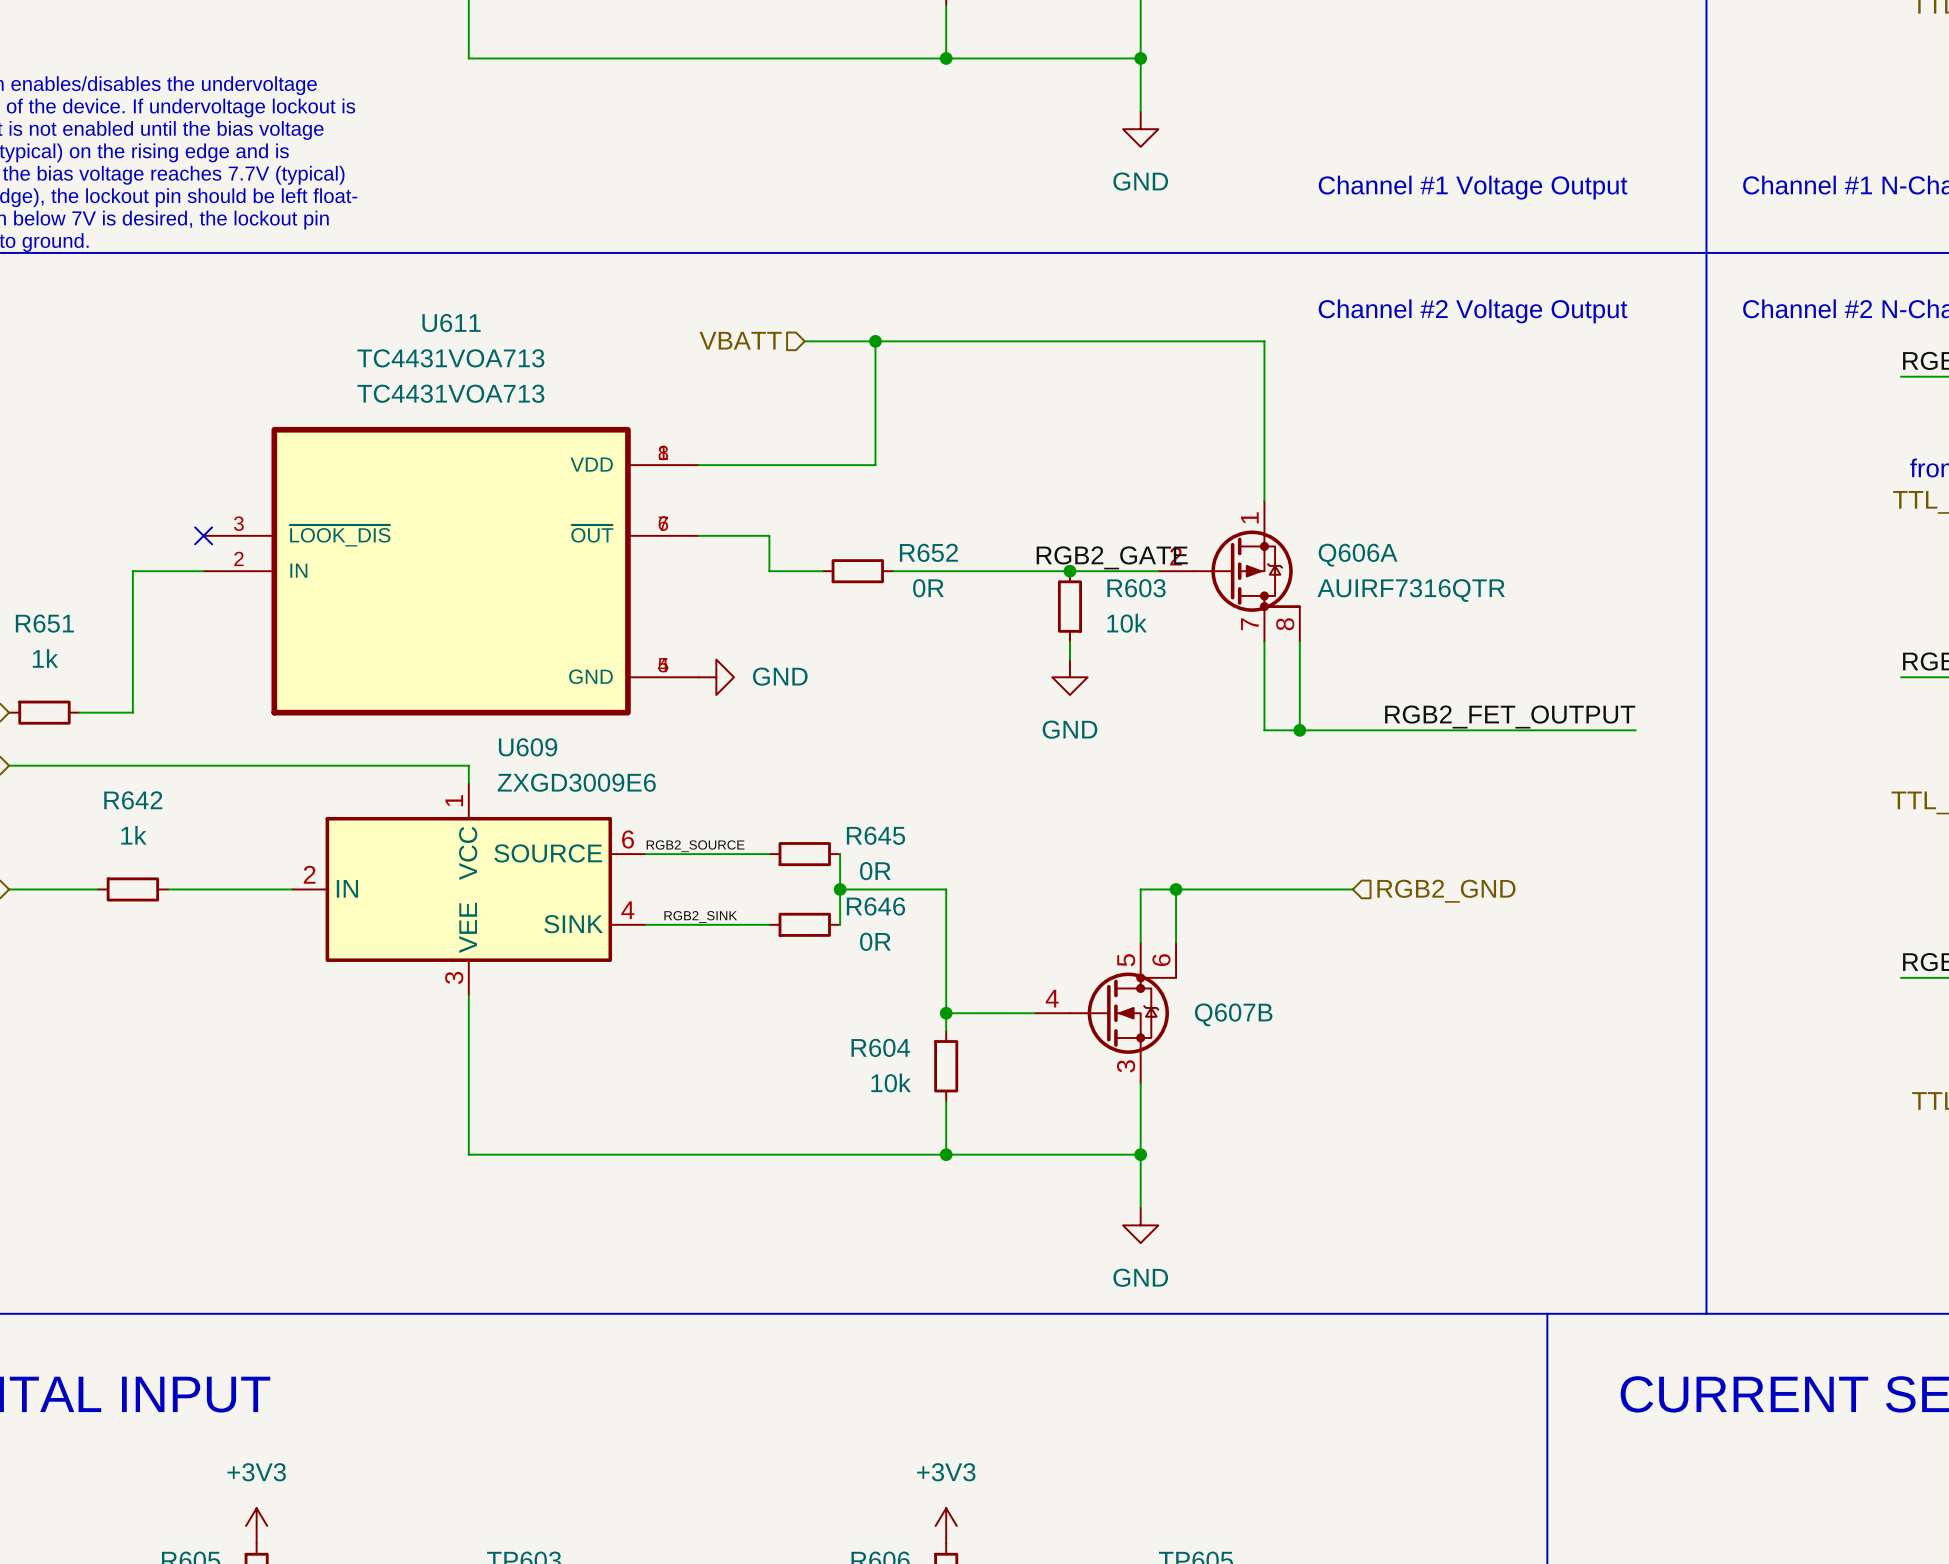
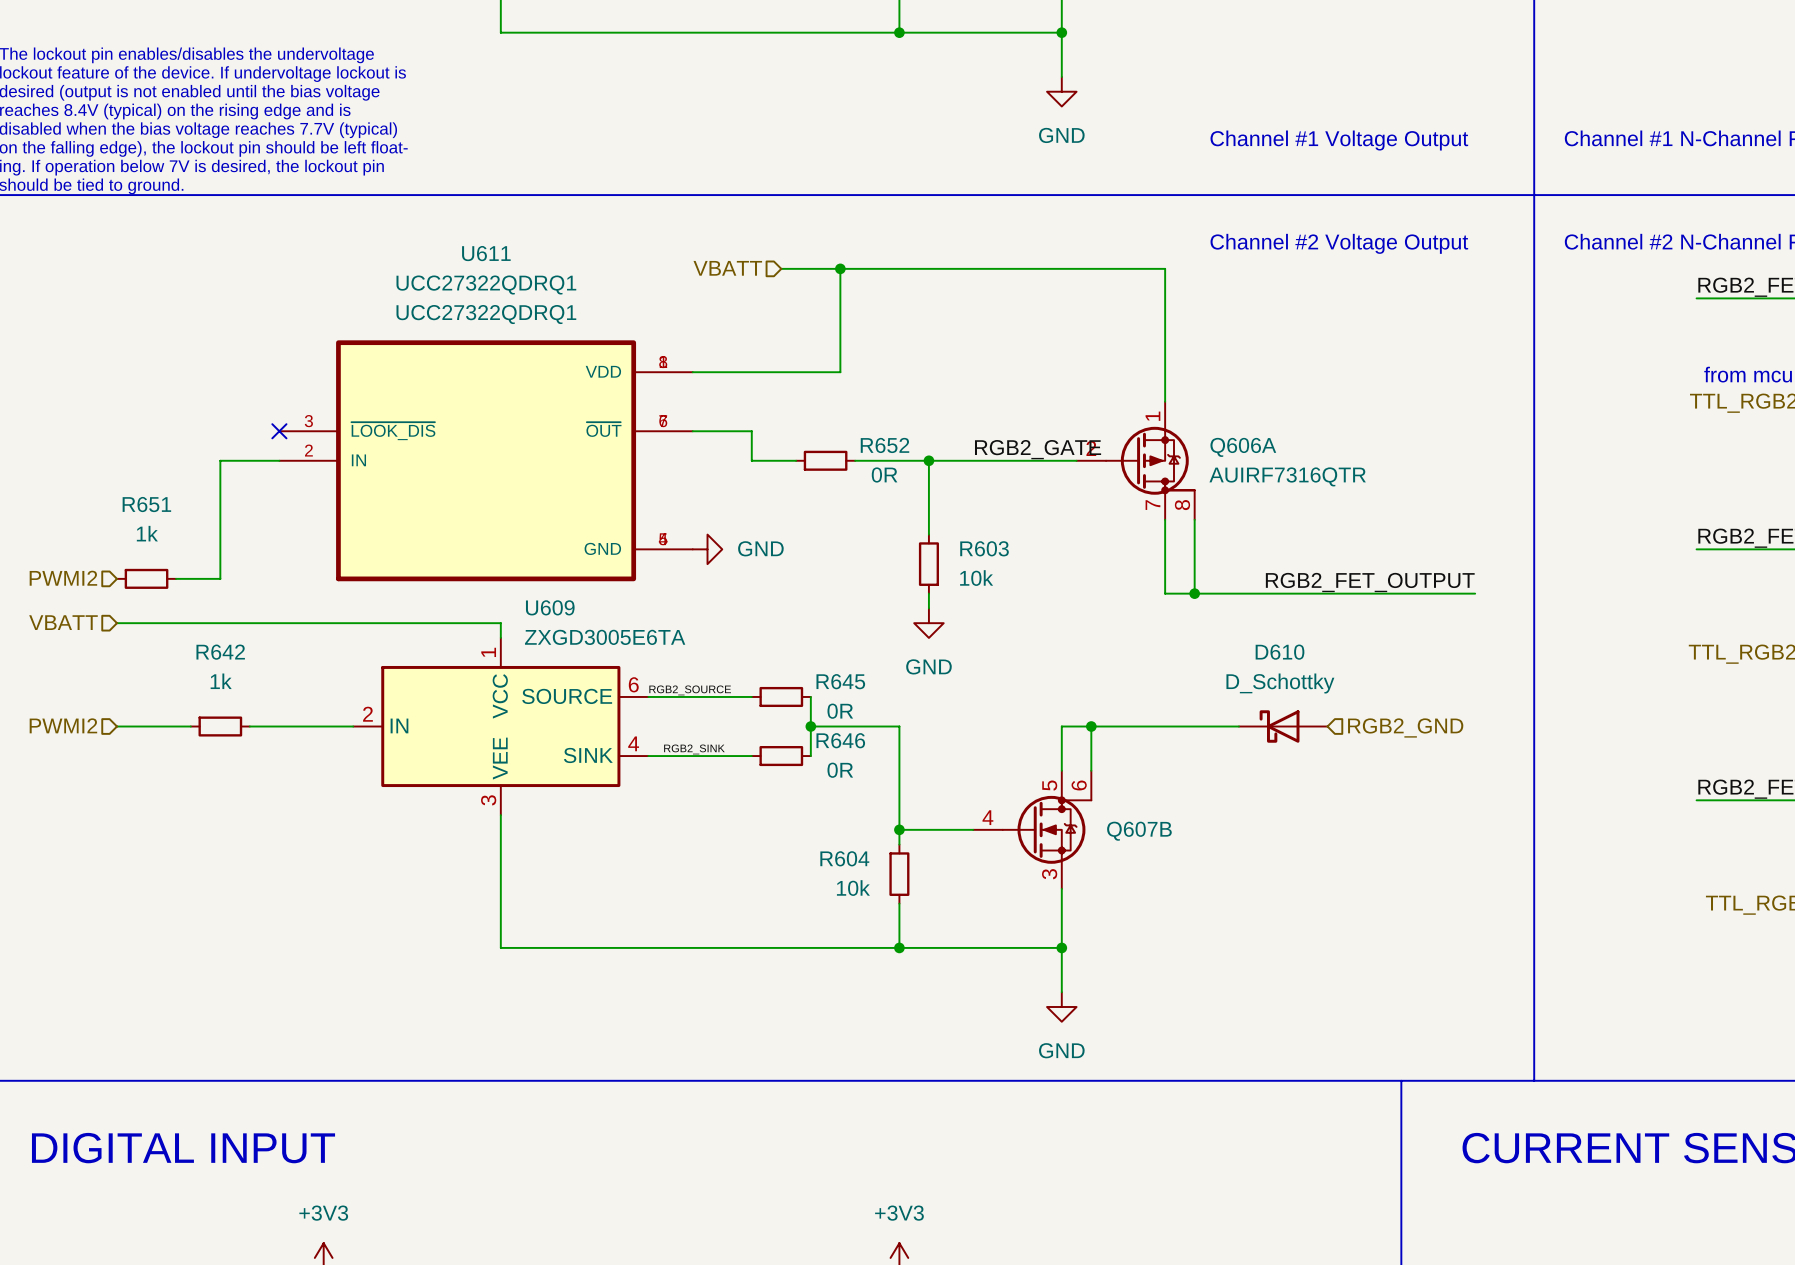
U611 value: TC4431VOA713 (450, 358) -> UCC27322QDRQ1 (486, 285)
U611 text: TC4431VOA713 (450, 393) -> UCC27322QDRQ1 (486, 314)
wire: none -> (928, 460) (928, 534)
junction: none -> (928, 460)
junction: (1069, 571) -> none
R603 position: (1069, 606) -> (928, 564)
wire: (1069, 641) (1069, 659) -> (928, 593) (928, 608)
power symbol position: GND (1069, 677) -> GND (928, 623)
U609 value: ZXGD3009E6 (576, 782) -> ZXGD3005E6TA (605, 637)
D610: none -> D_Schottky (1283, 726)
hierarchical label position: RGB2_GND (1446, 891) -> RGB2_GND (1405, 727)

